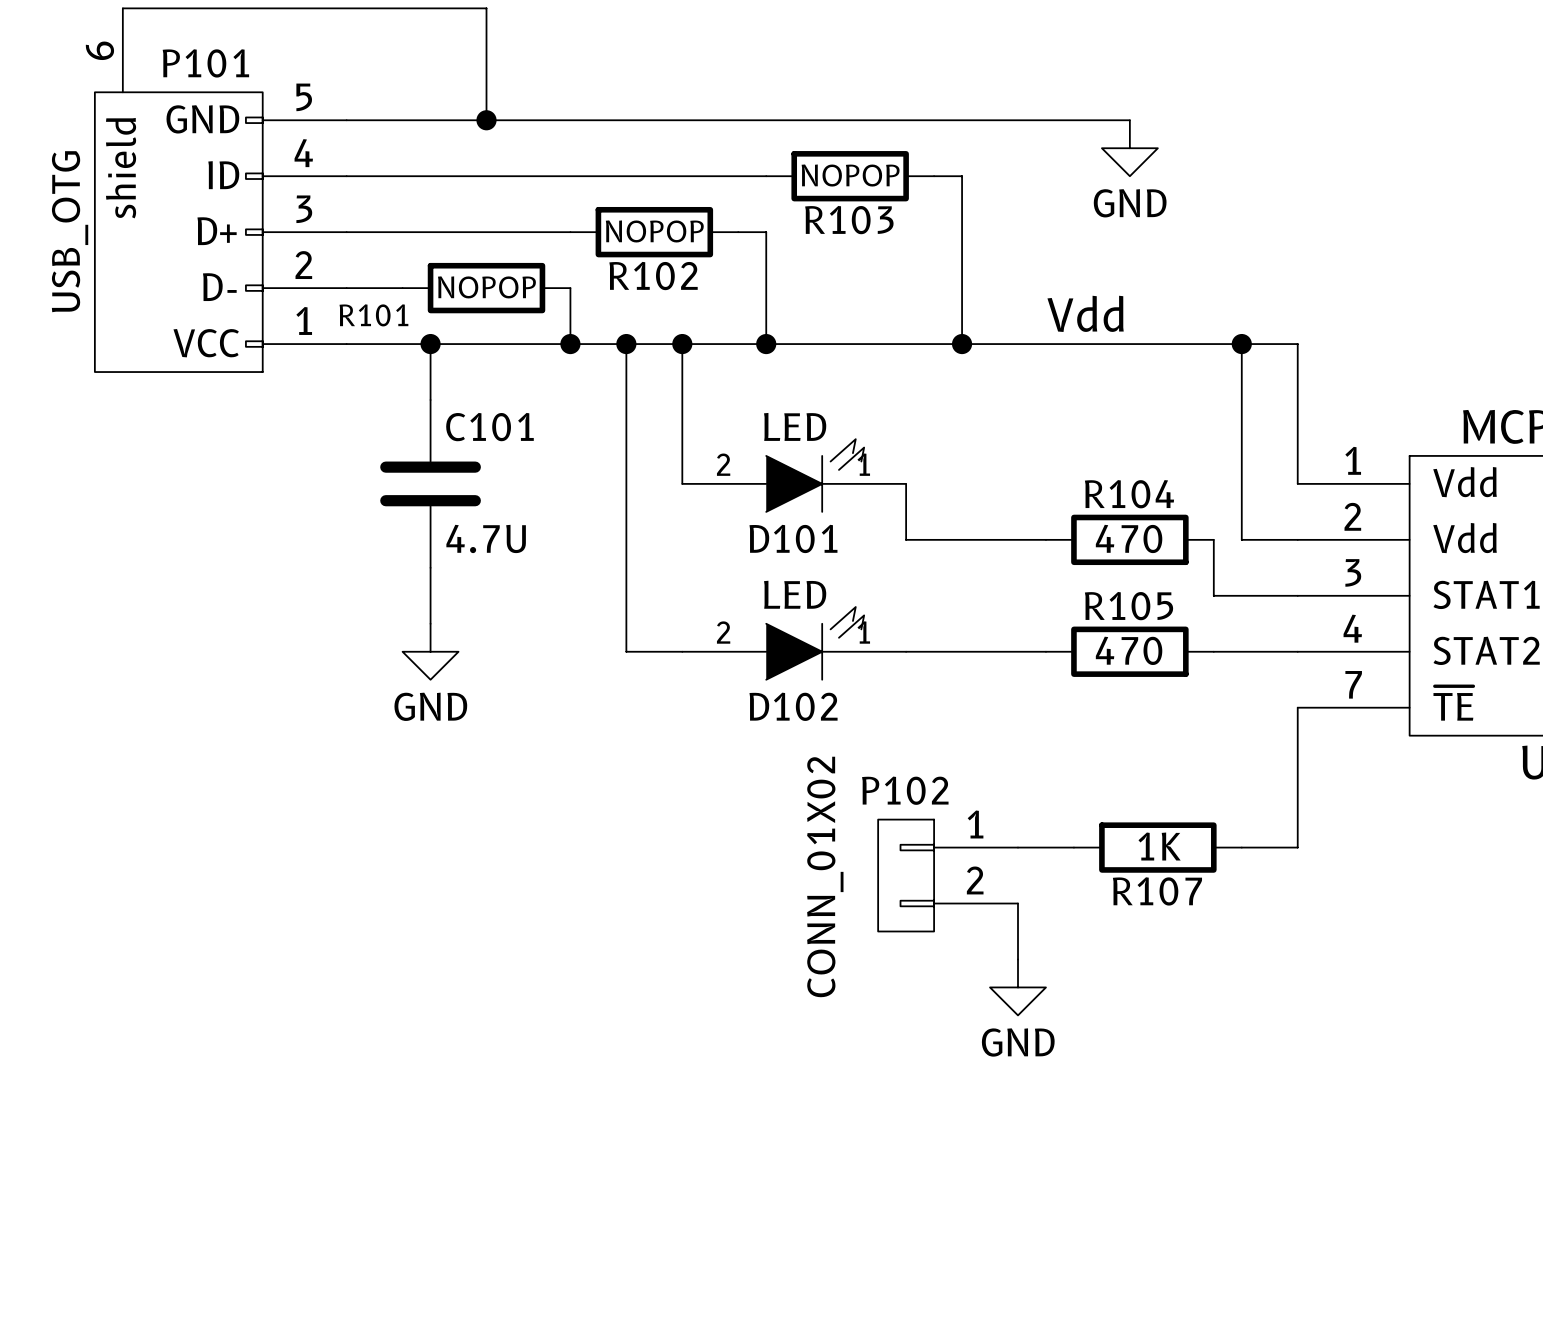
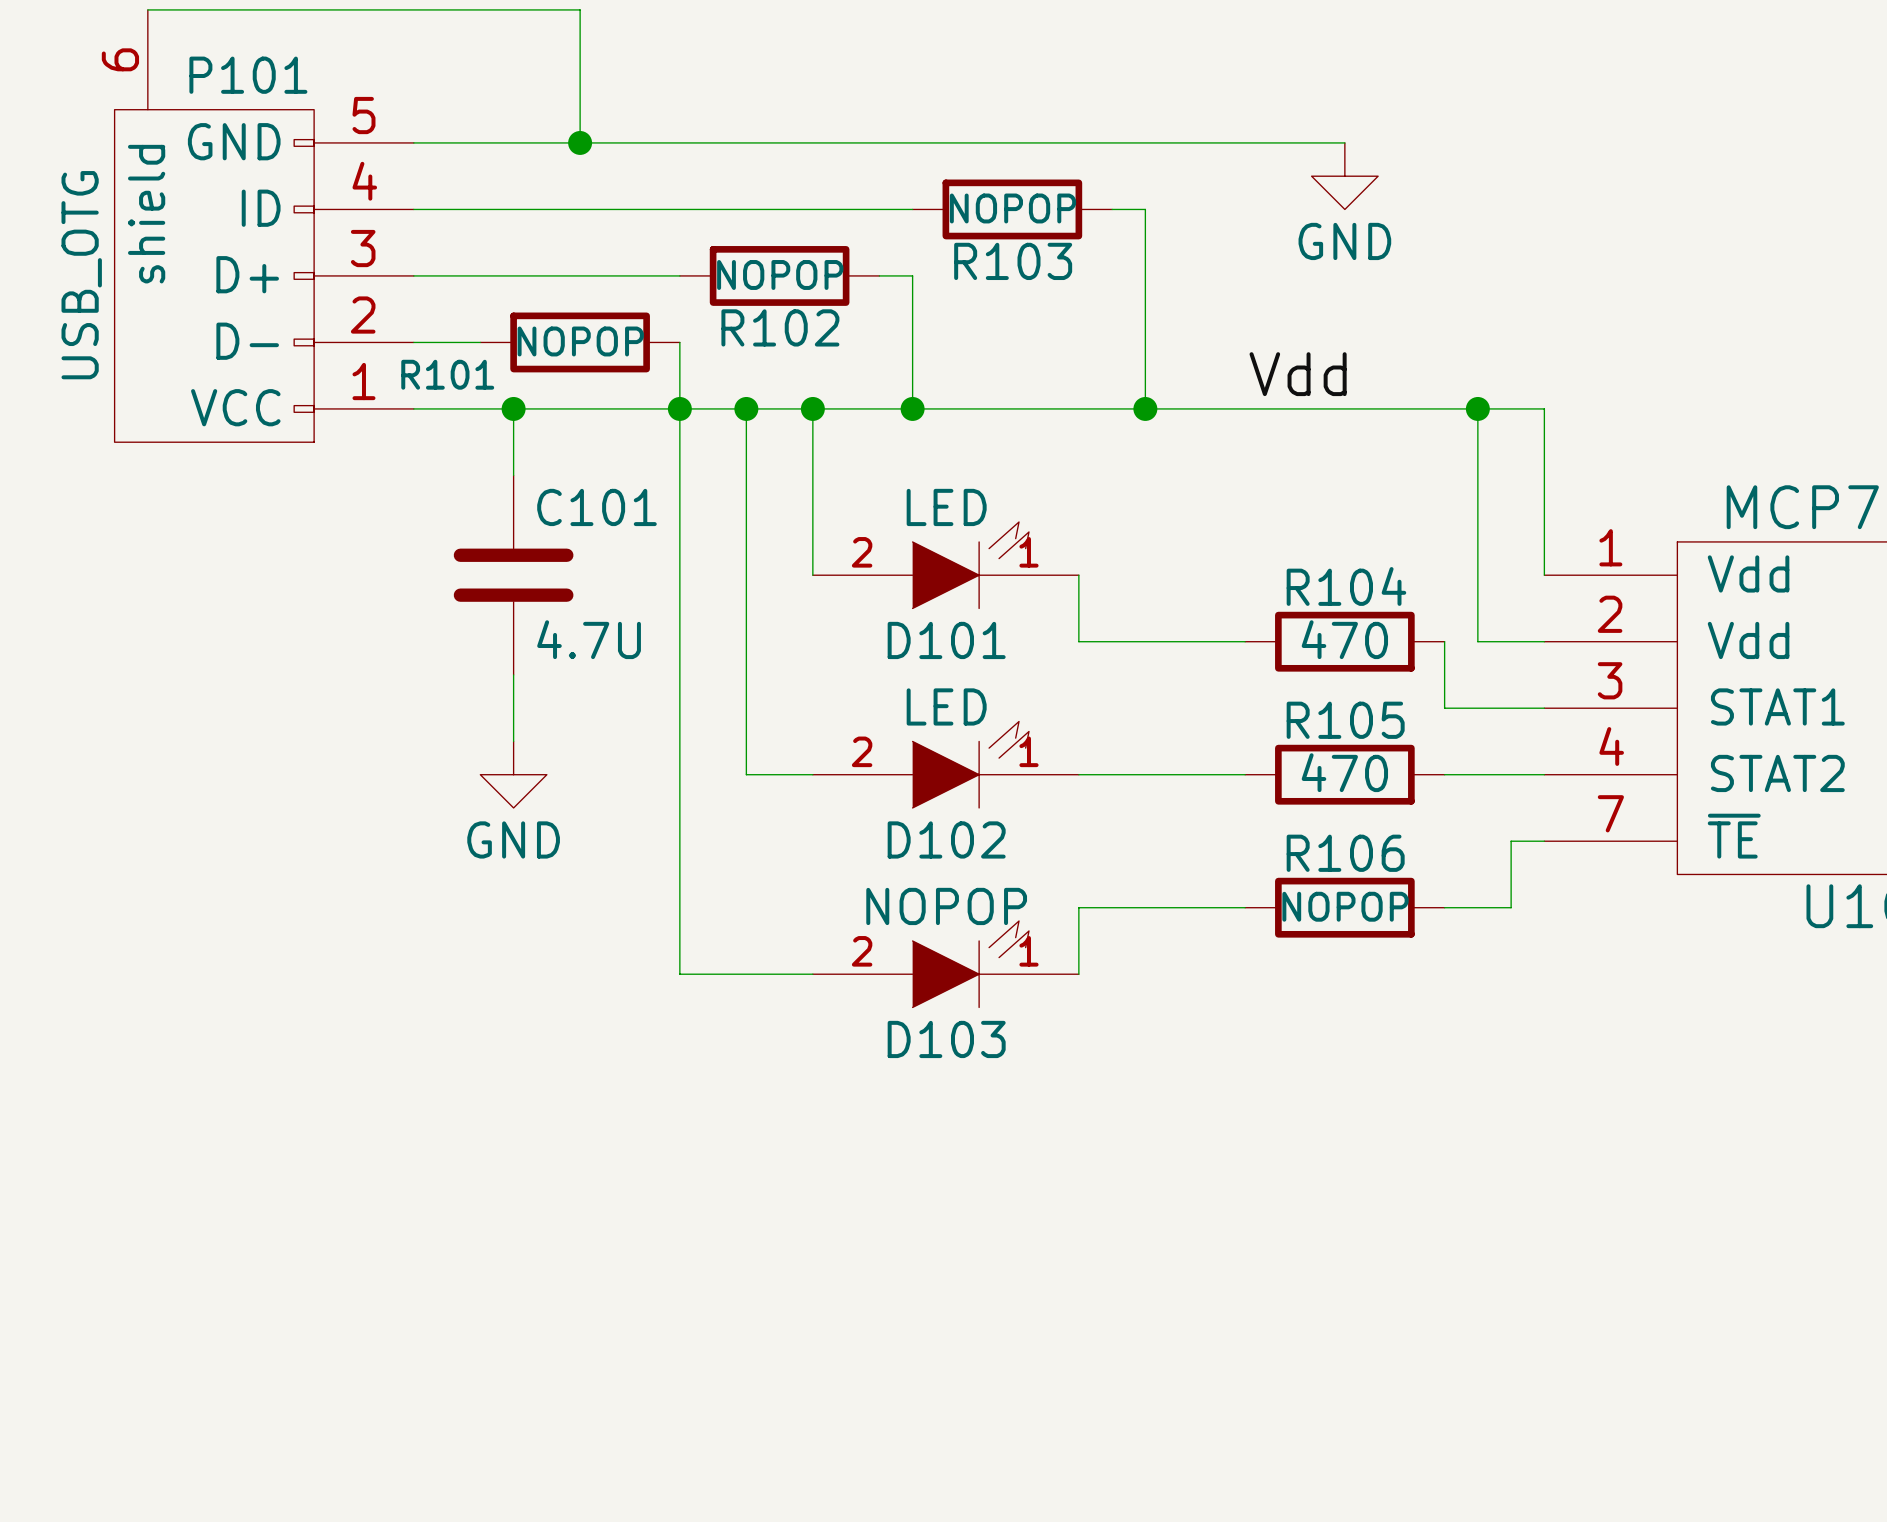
wire: none -> (679, 408) (679, 974) (812, 974)
wire: (1297, 707) (1297, 847) (1241, 847) -> (1544, 841) (1511, 841) (1511, 907) (1444, 907)
wire: none -> (1245, 907) (1078, 907) (1078, 974)
R106: none -> NOPOP (1344, 907)
D103: none -> NOPOP (945, 964)
wire: (1018, 847) (1073, 847) -> none
R107: 1K (1157, 847) -> none
P102: CONN_01X02 (948, 875) -> none
wire: (1018, 903) (1018, 959) -> none
power symbol: GND (1018, 987) -> none

